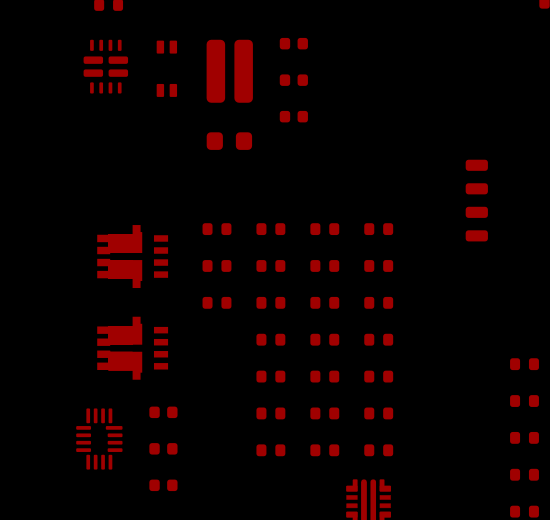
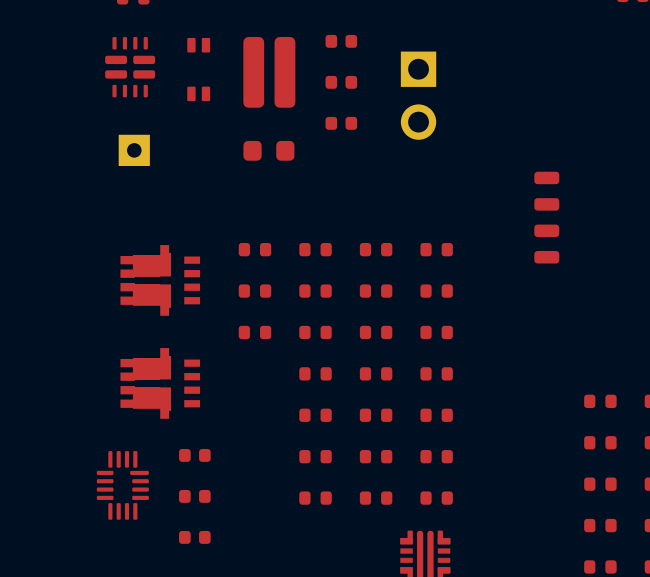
part: none -> (418, 95)
part: none -> (134, 150)

